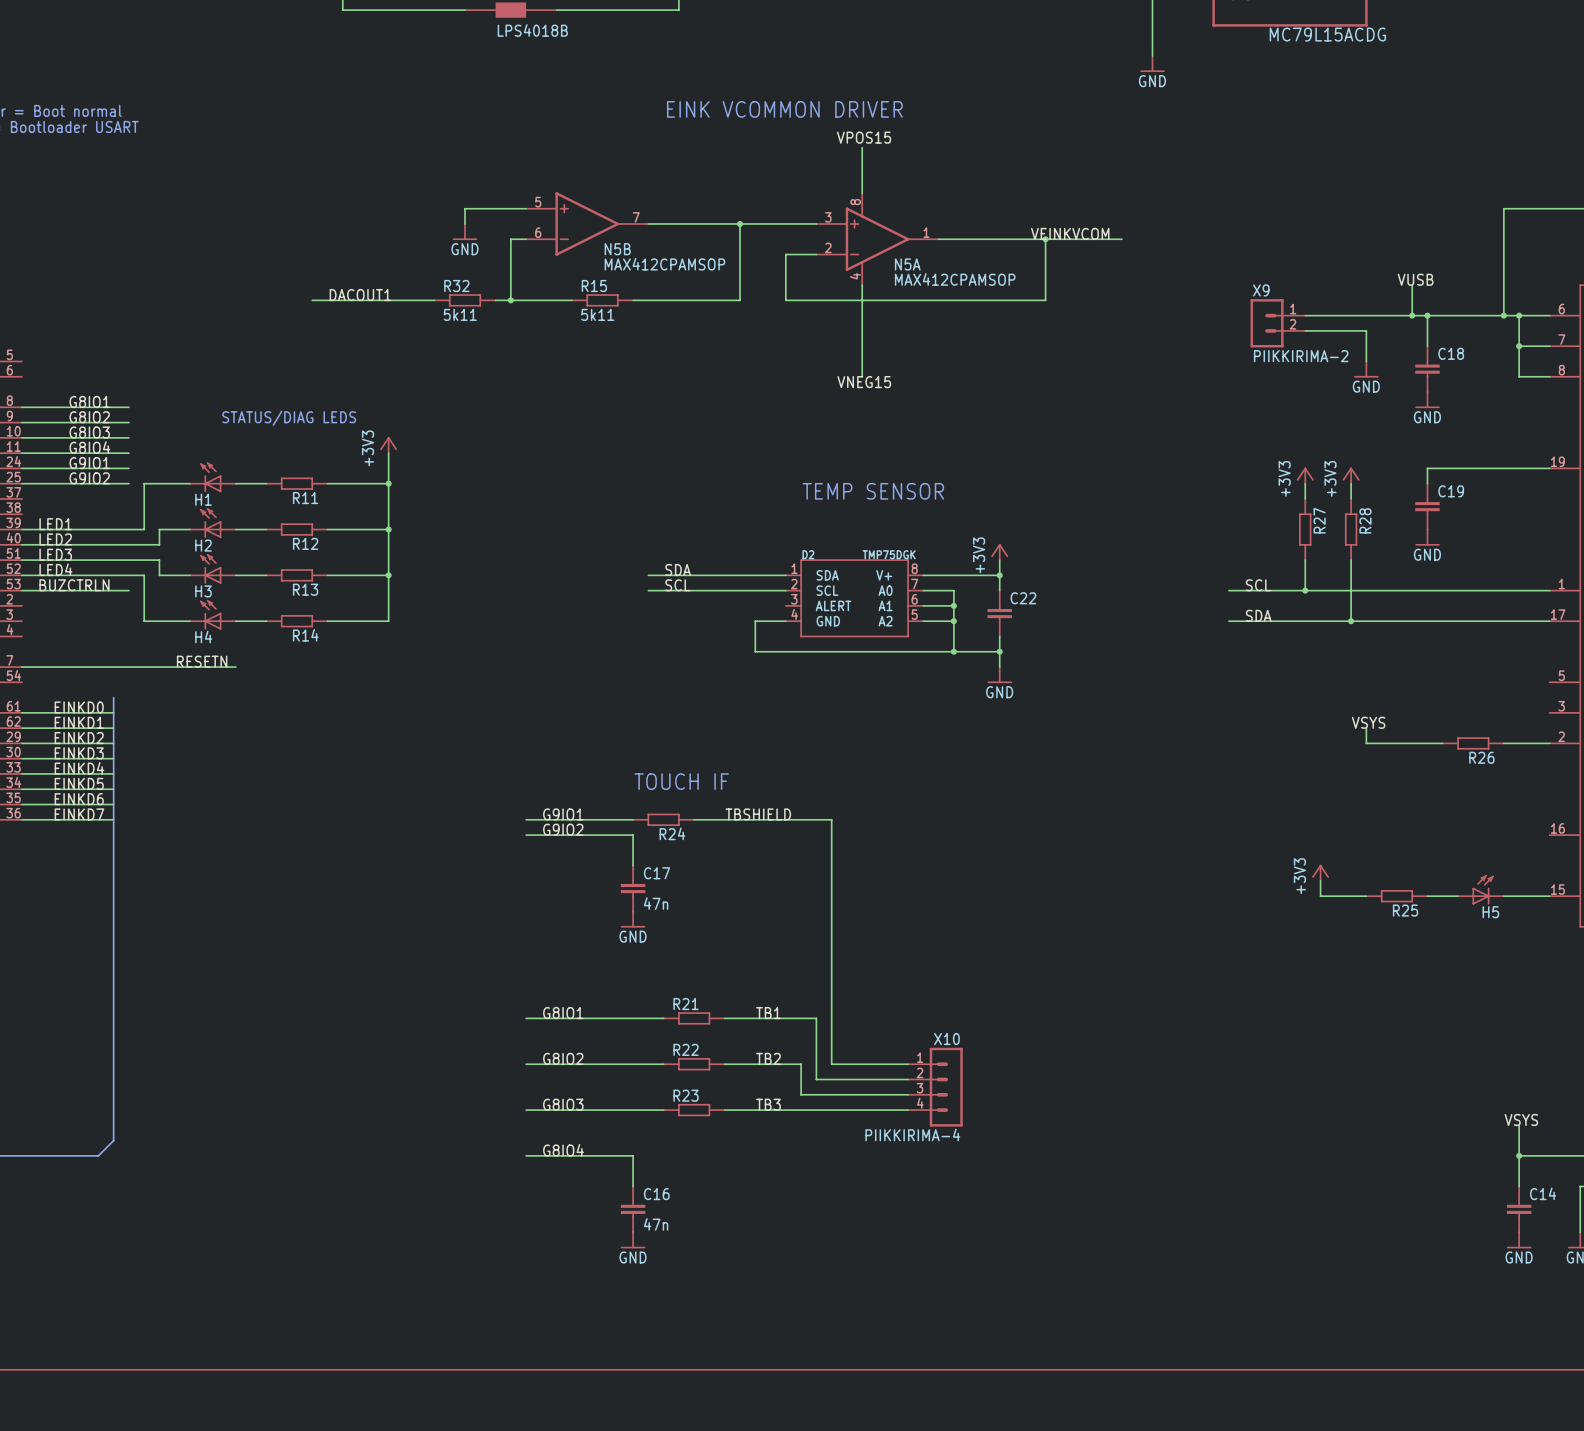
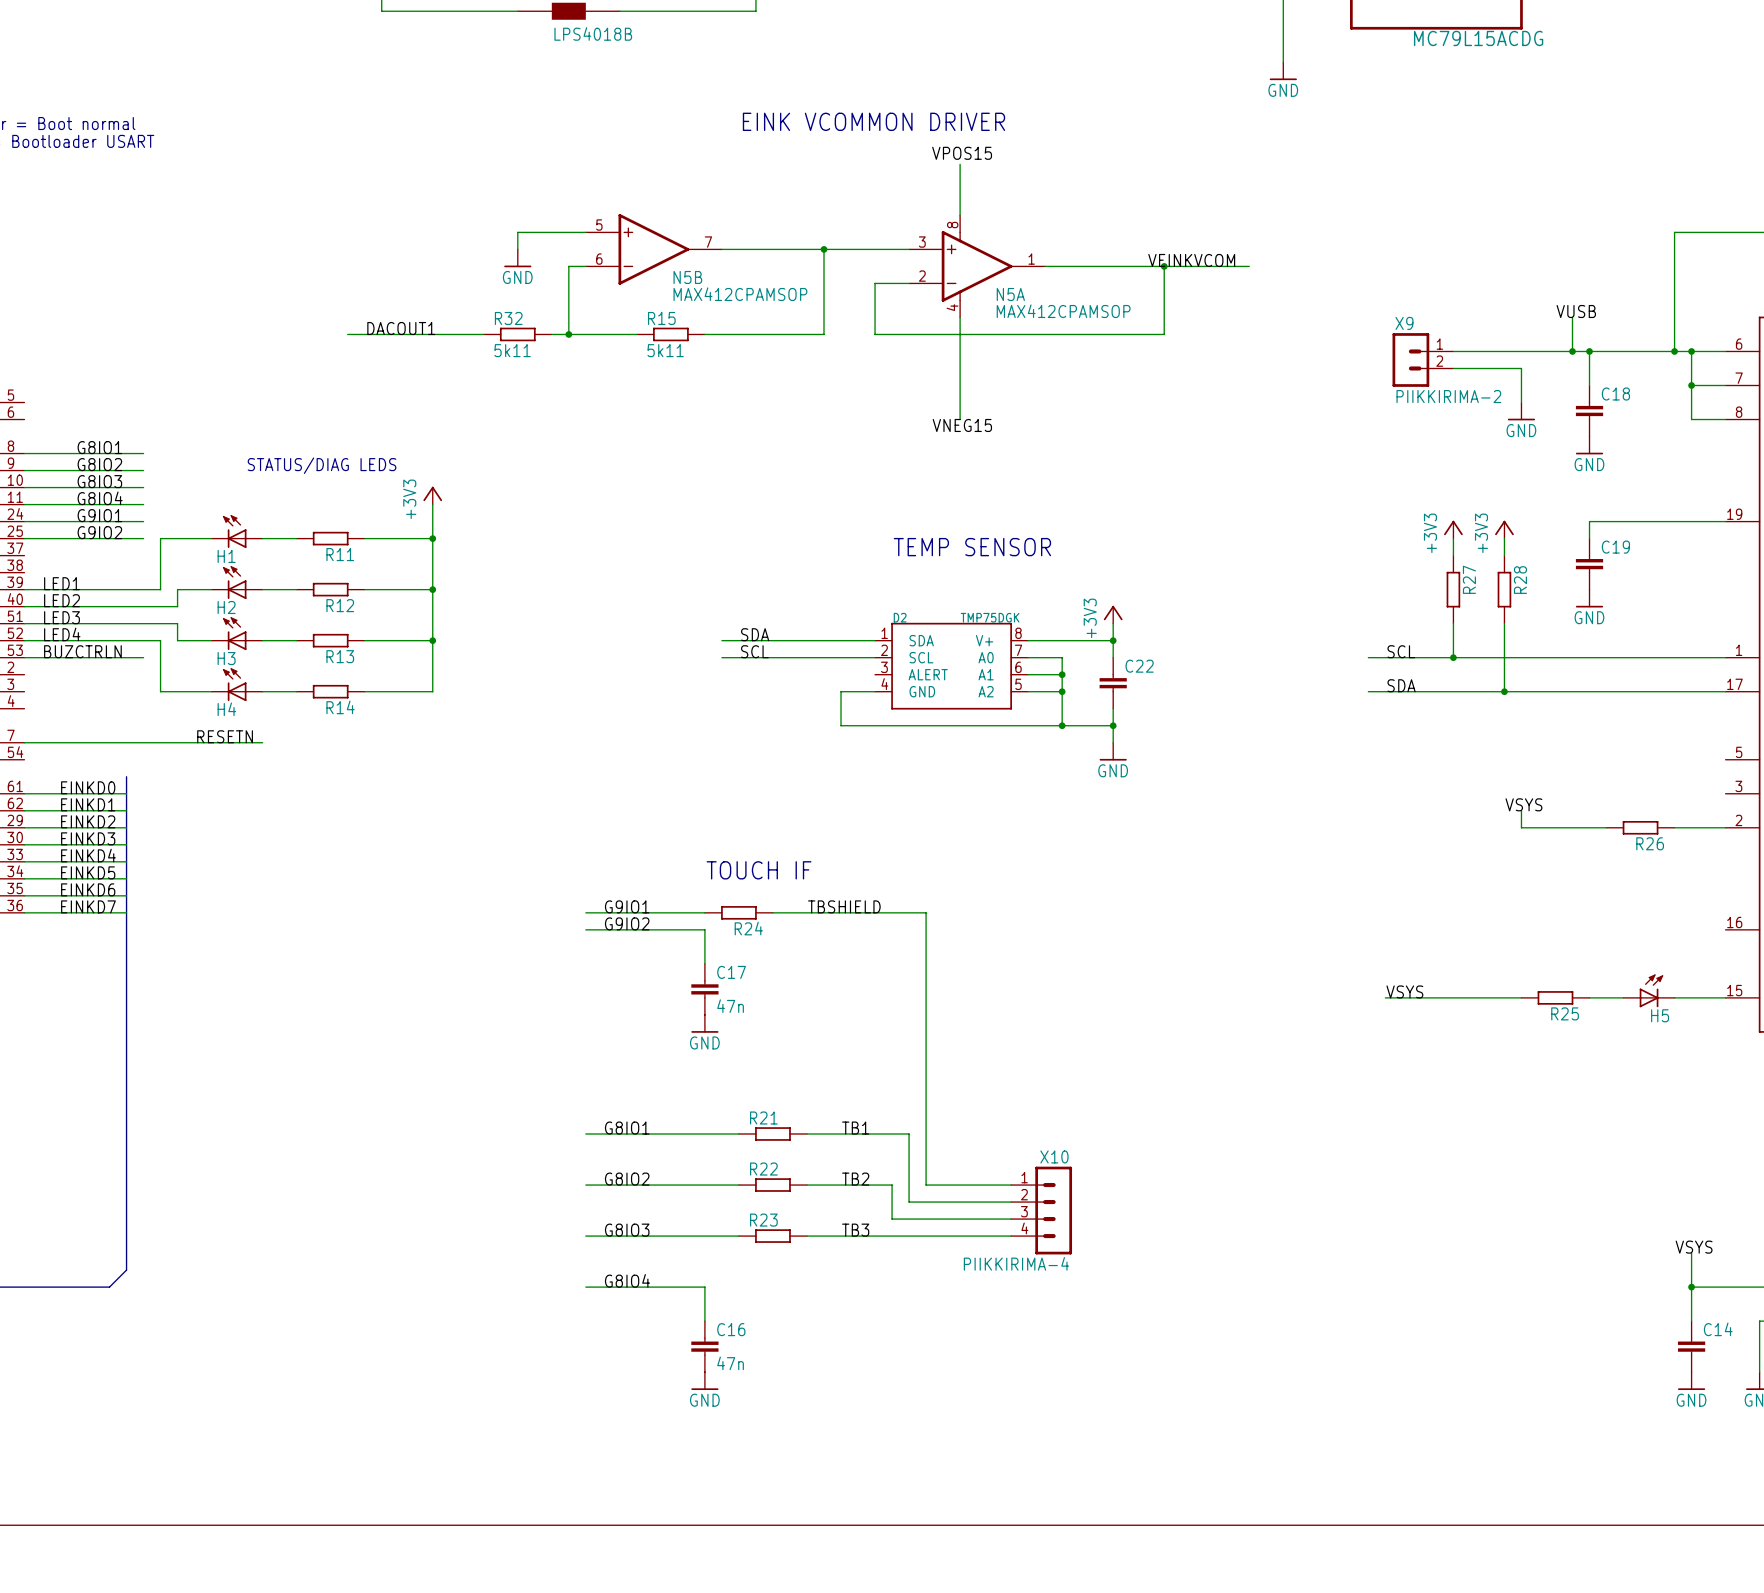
power symbol: +3V3 (1320, 872) -> none
wire: (1320, 880) (1320, 896) -> (1385, 997) (1470, 997)
label: none -> VSYS (1404, 991)

